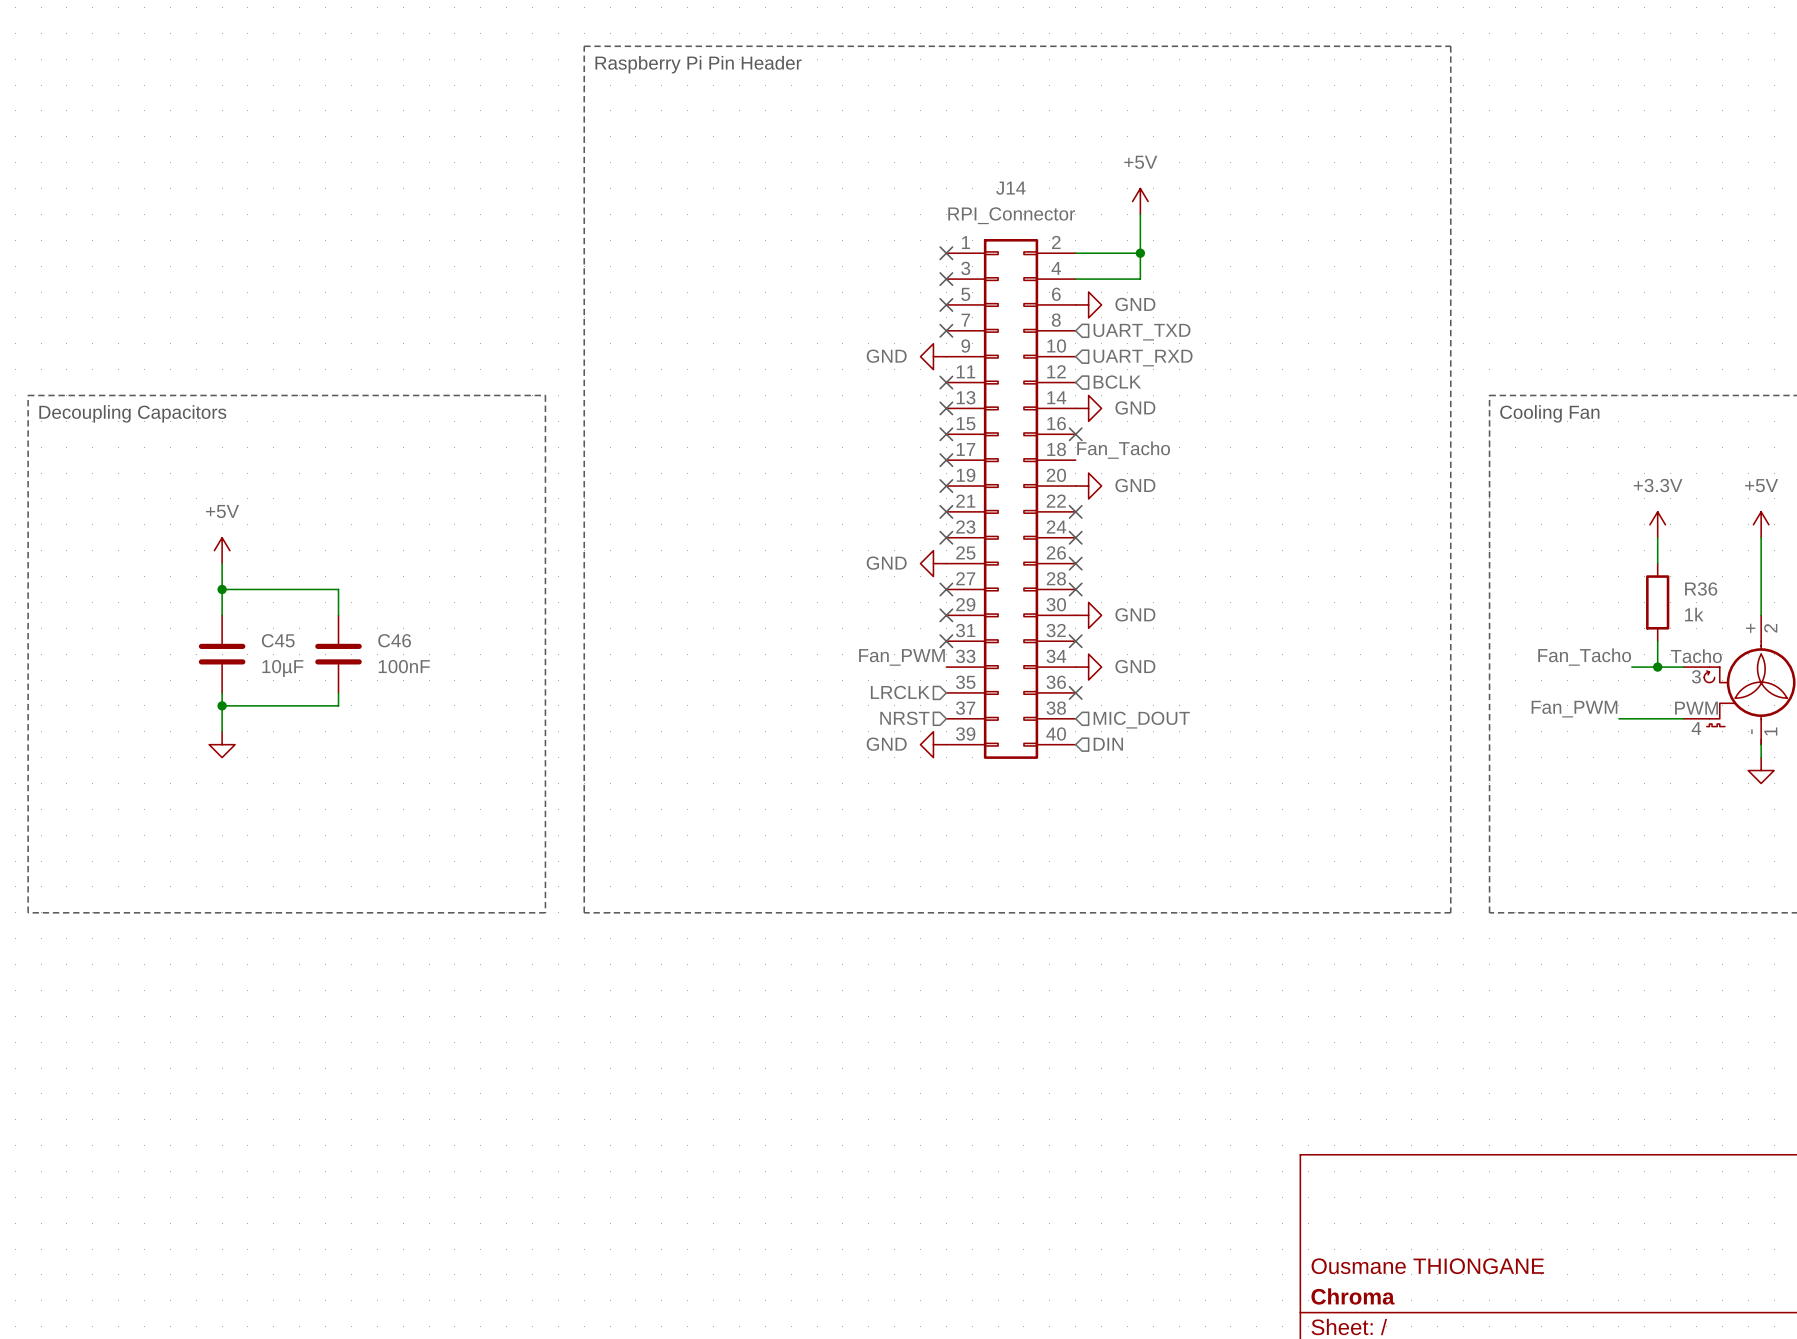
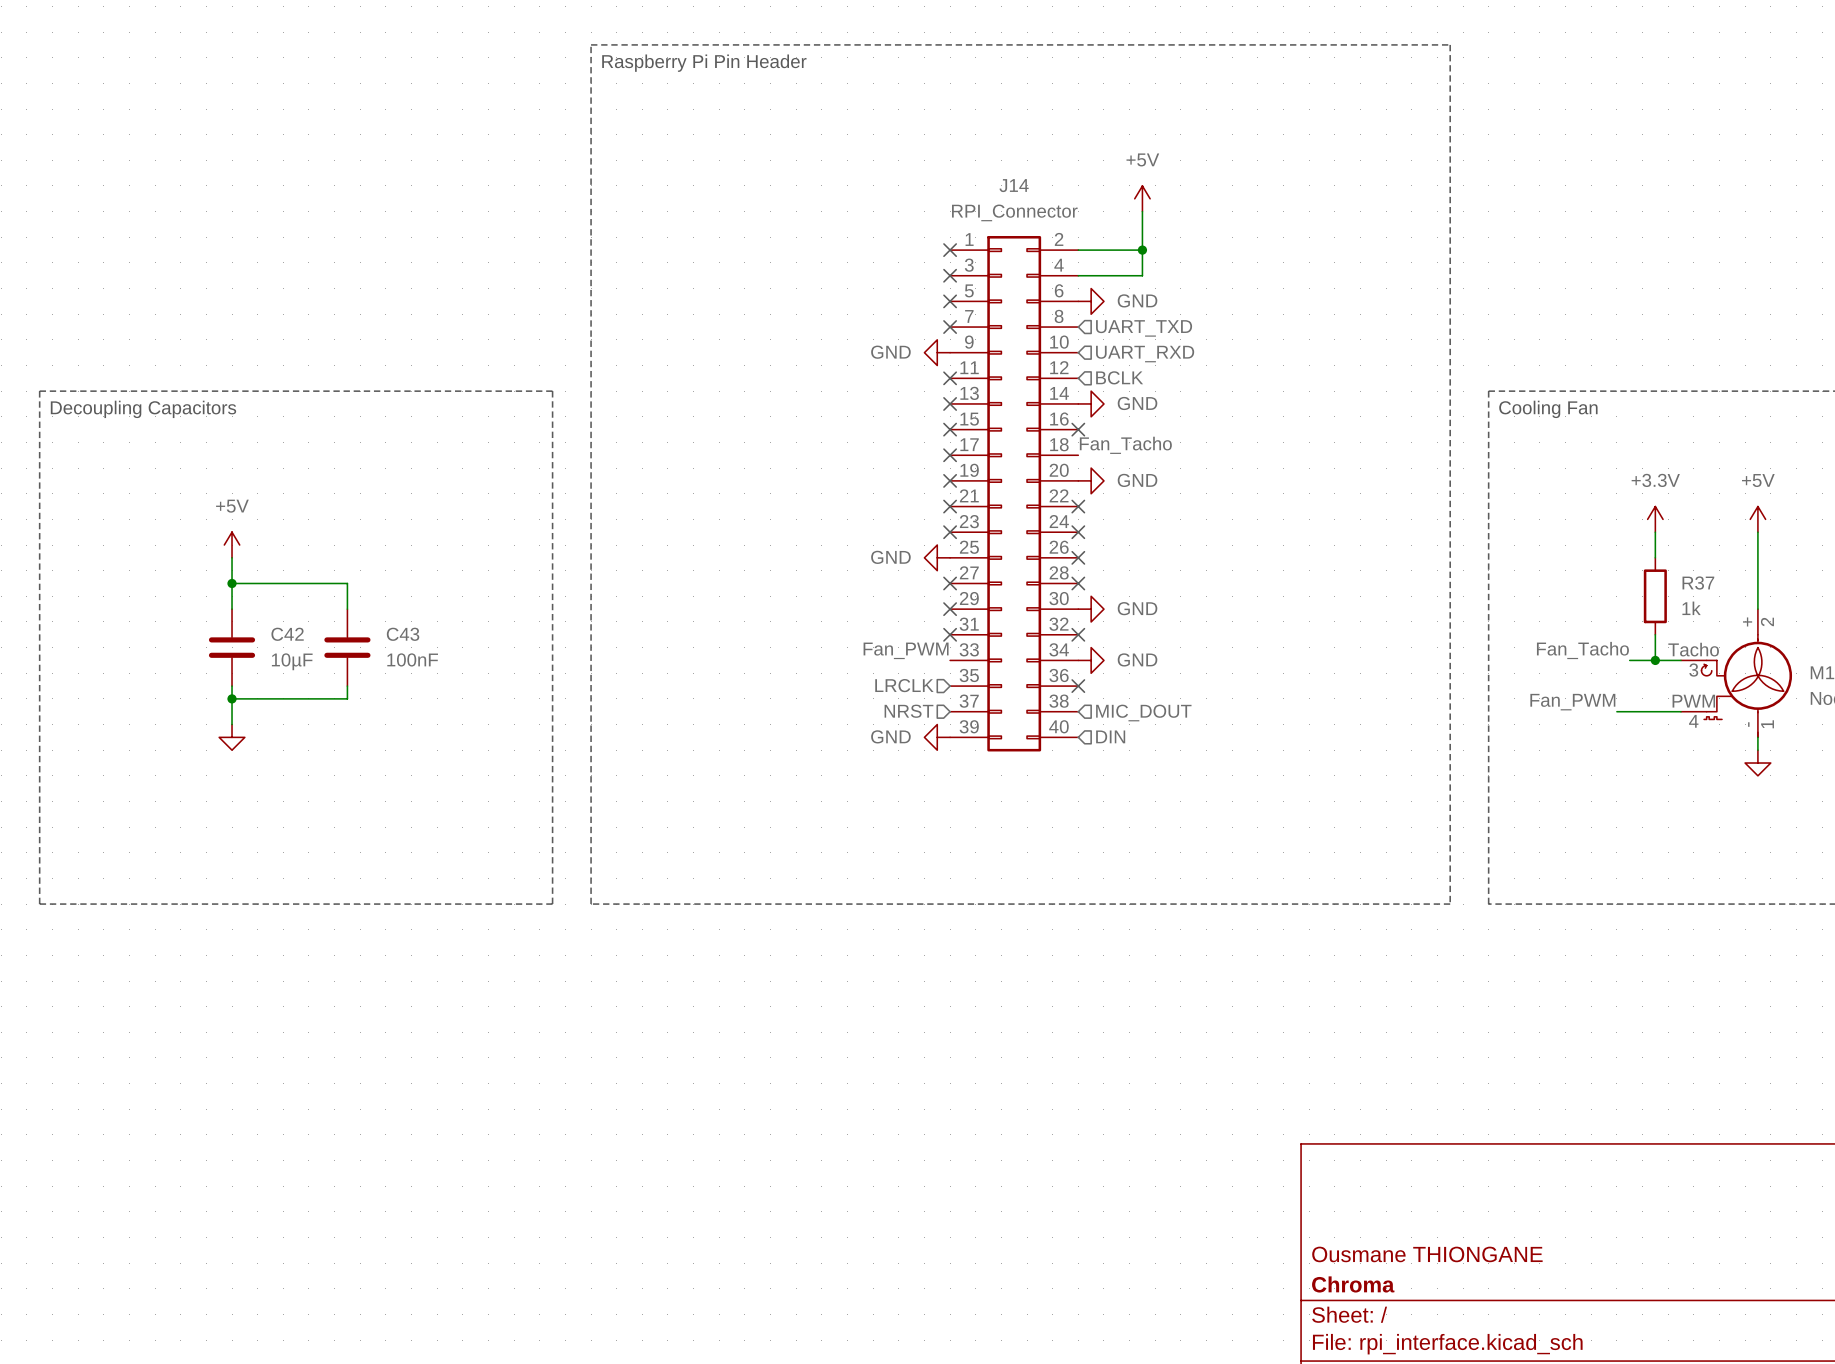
R36 name: R36 (1701, 588) -> R37 (1698, 583)
C45 name: C45 (278, 640) -> C42 (287, 634)
C46 name: C46 (394, 640) -> C43 (403, 634)

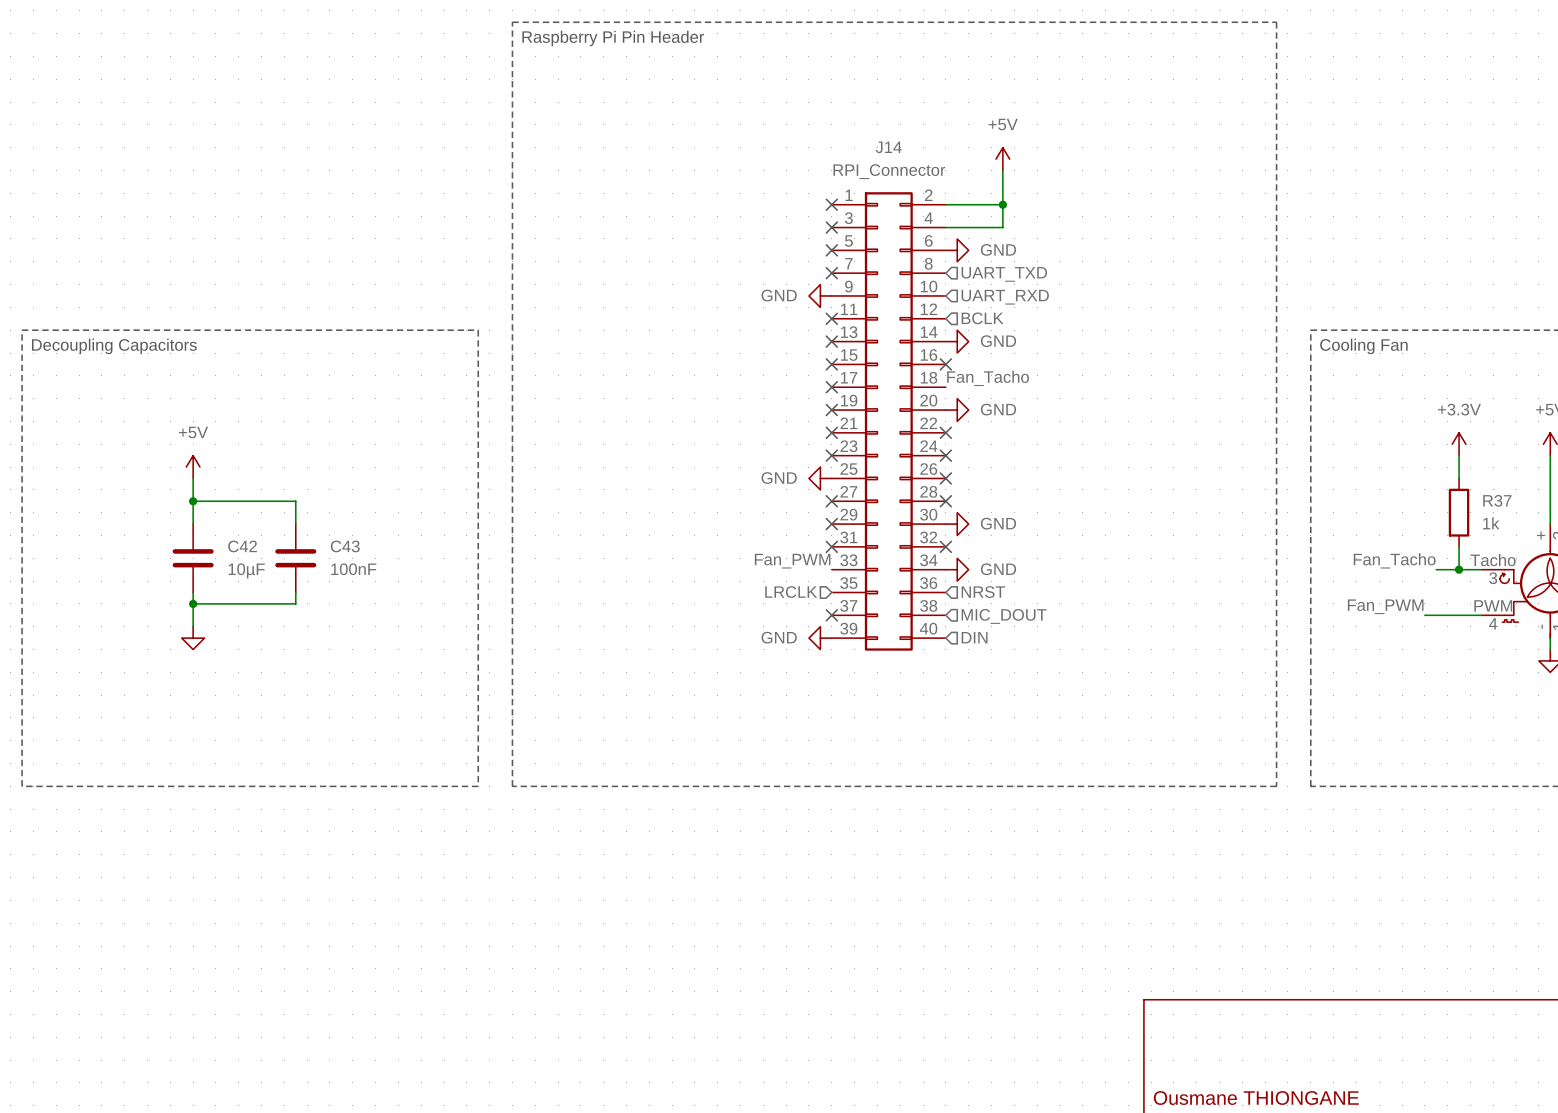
no-connect mark: (1078, 686) -> none
hierarchical label rotation: 0° (908, 711) -> 180° (983, 592)
hierarchical label position: NRST (908, 711) -> NRST (983, 592)
no-connect mark: none -> (831, 615)

